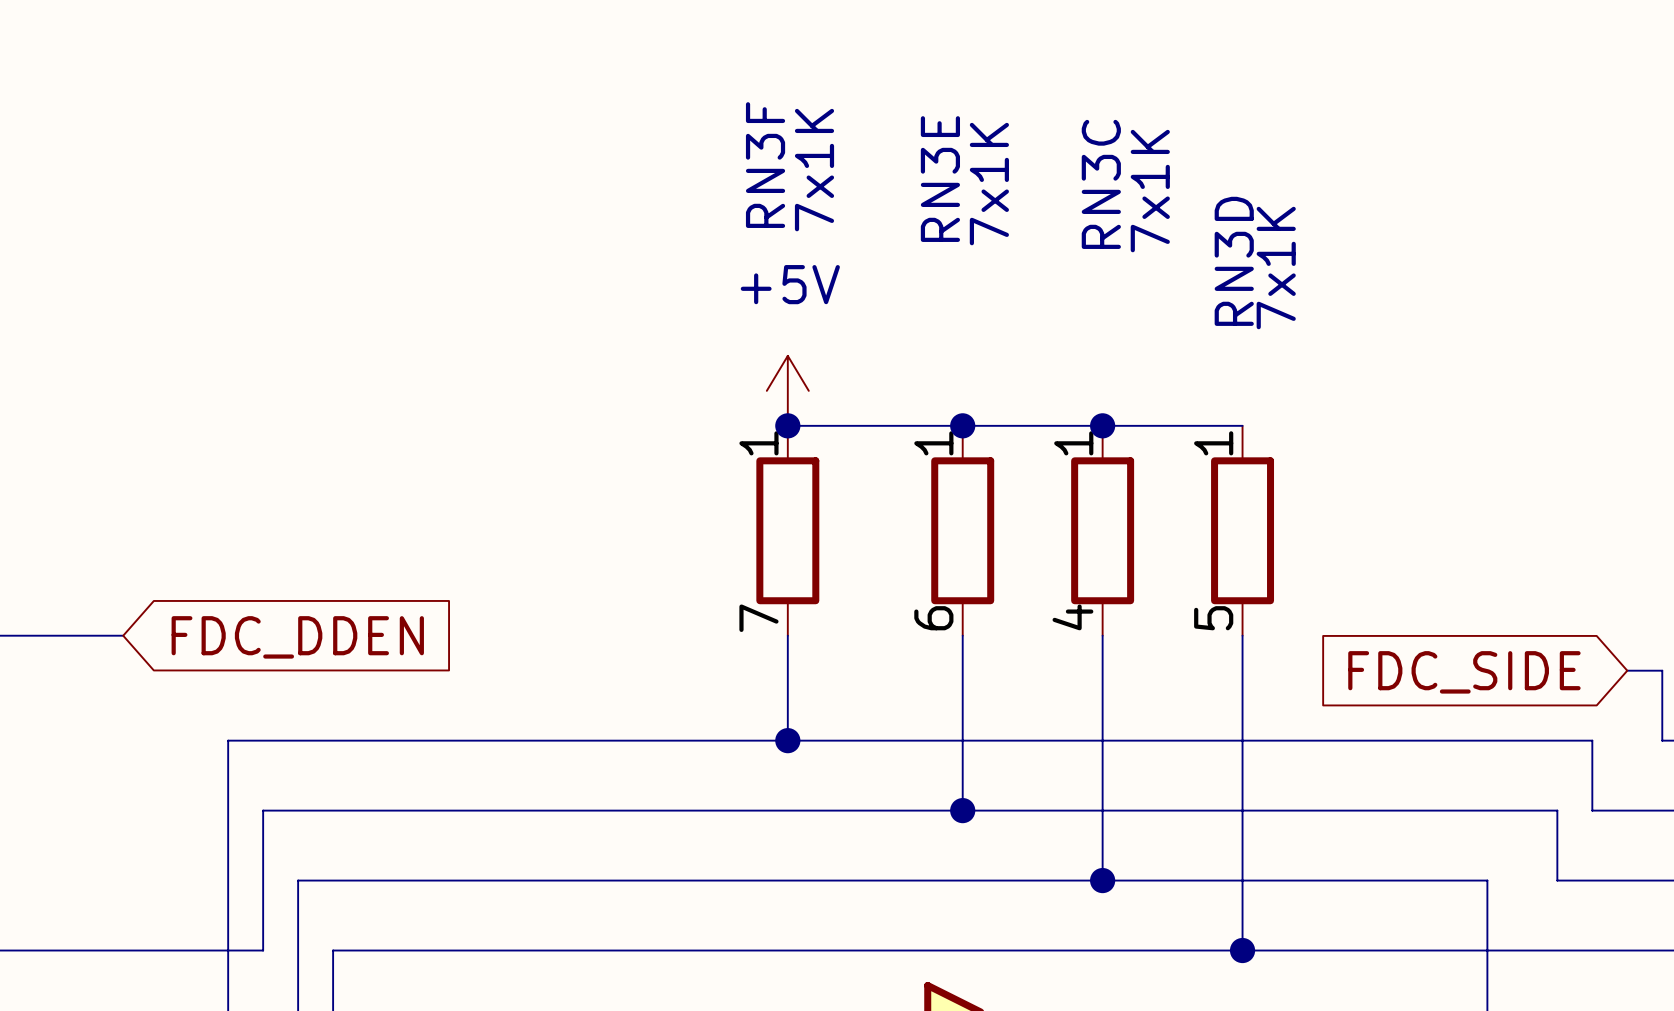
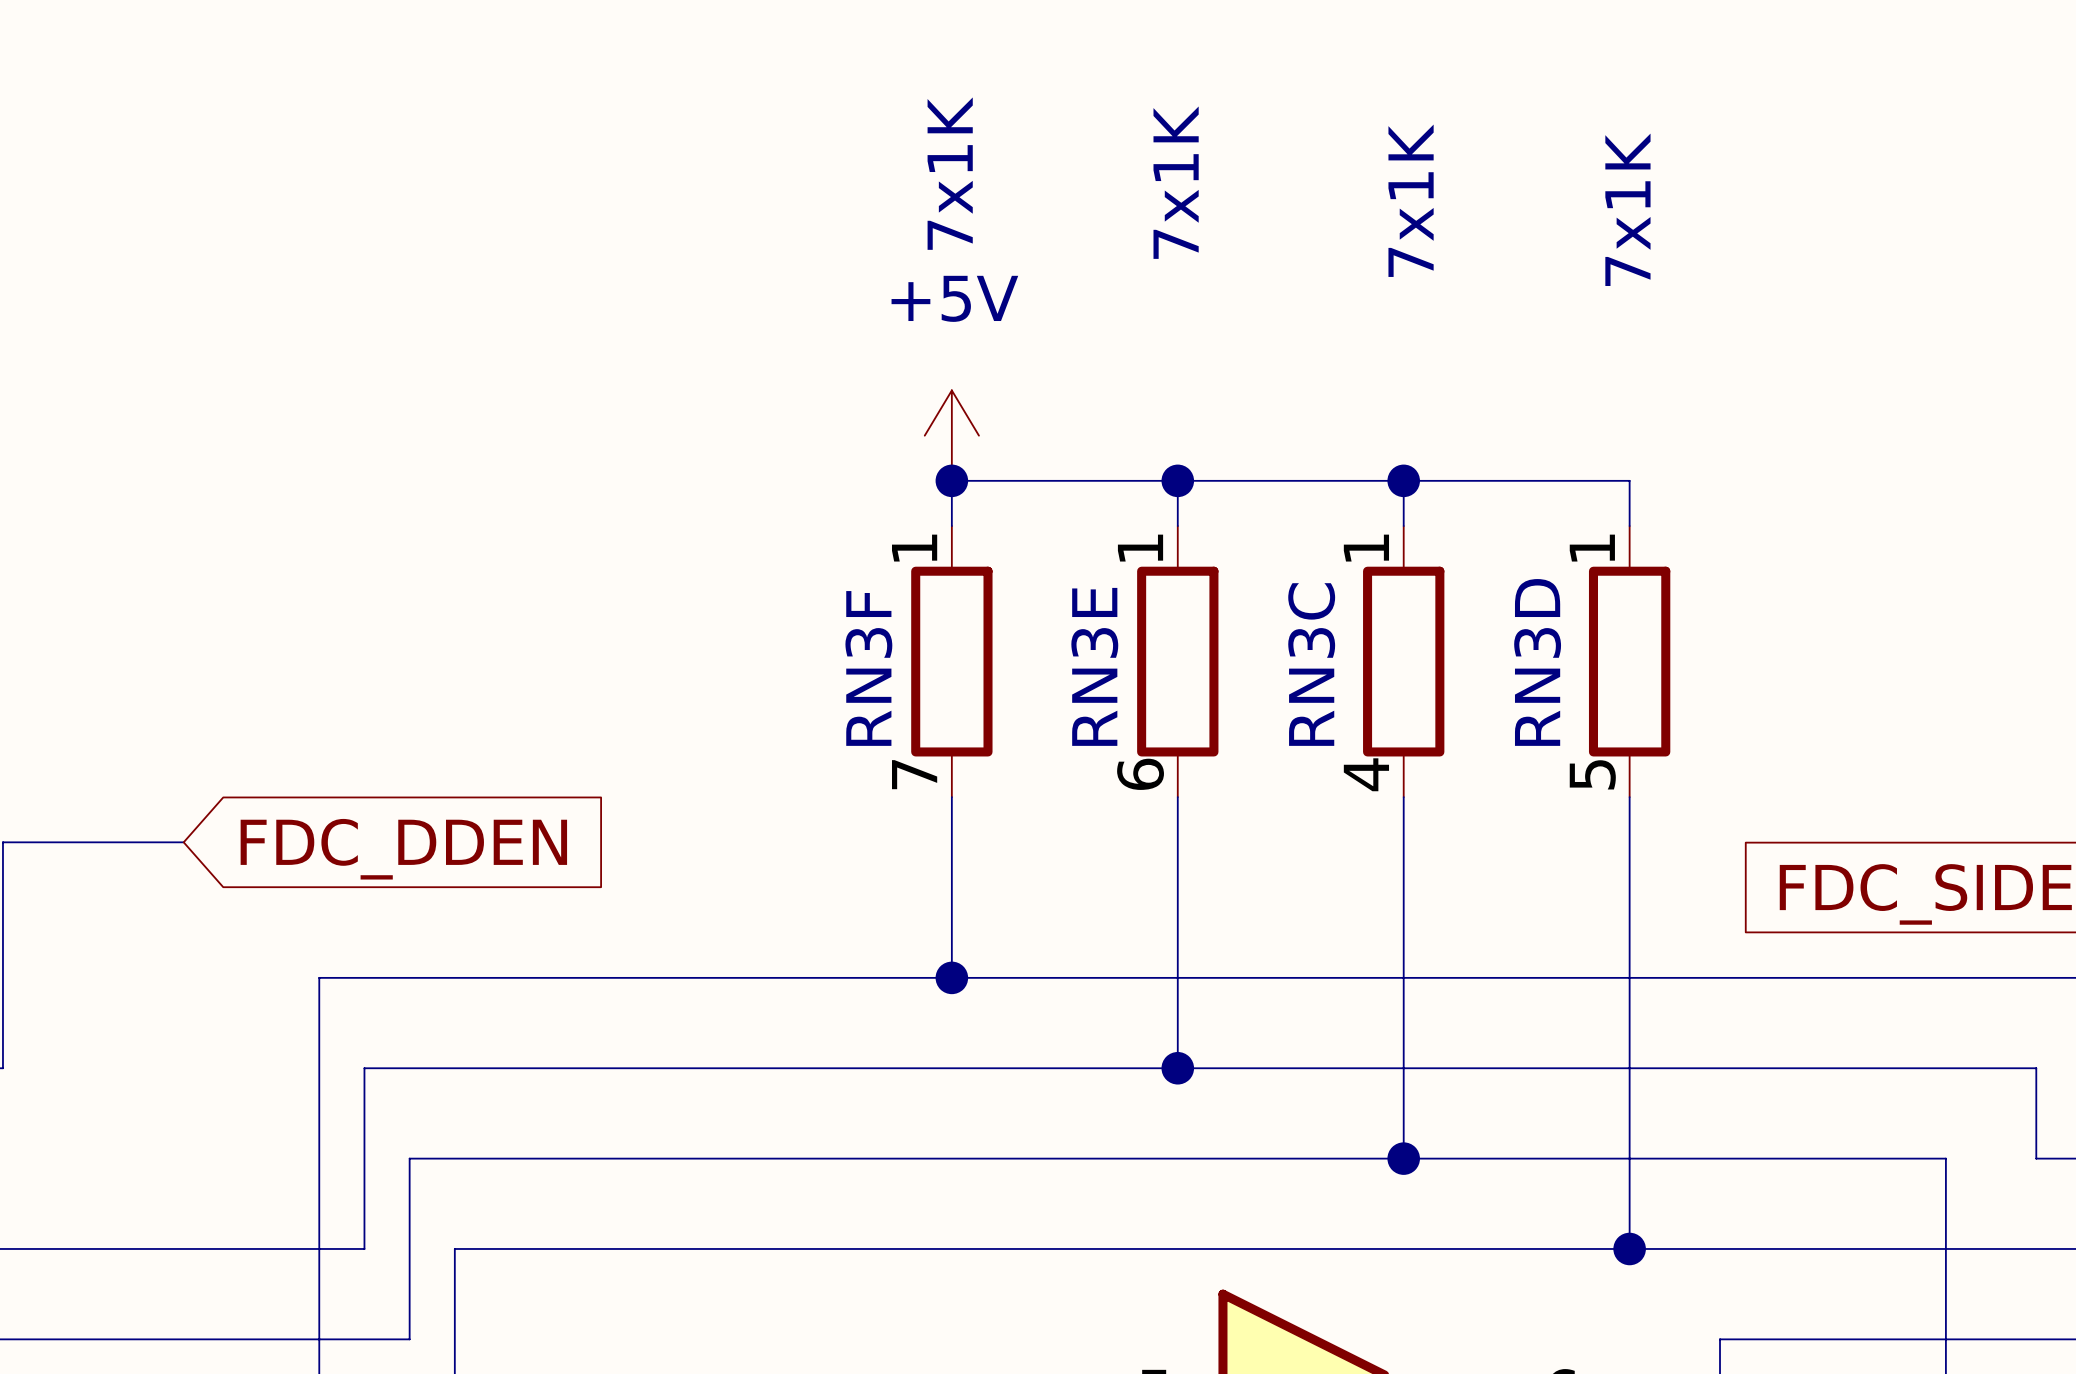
RN3F name position: RN3F (765, 165) -> RN3F (868, 668)
RN3F value position: 7x1K (814, 170) -> 7x1K (950, 173)
RN3E name position: RN3E (940, 179) -> RN3E (1094, 666)
RN3E value position: 7x1K (989, 184) -> 7x1K (1176, 182)
RN3C name position: RN3C (1101, 184) -> RN3C (1311, 664)
RN3C value position: 7x1K (1150, 191) -> 7x1K (1411, 200)
RN3D name position: RN3D (1234, 261) -> RN3D (1537, 662)
RN3D value position: 7x1K (1276, 268) -> 7x1K (1627, 209)
junction: none -> (951, 480)
wire: none -> (1177, 480) (1177, 526)
junction: none -> (1177, 480)
wire: none -> (1403, 480) (1403, 526)
junction: none -> (1403, 480)
wire: none -> (951, 526) (951, 480) (1629, 480) (1629, 526)
power symbol position: +5V (787, 390) -> +5V (951, 435)
wire: (787, 425) (1242, 425) -> none
junction: (787, 425) -> none
junction: (962, 425) -> none
junction: (1102, 425) -> none
RN3F position: (787, 530) -> (951, 661)
RN3E position: (962, 530) -> (1177, 661)
RN3C position: (1102, 530) -> (1403, 661)
RN3D position: (1242, 530) -> (1629, 661)
wire: none -> (951, 797) (951, 977)
wire: none -> (1177, 797) (1177, 1068)
wire: none -> (1403, 797) (1403, 1158)
wire: (787, 635) (787, 740) -> none
wire: (962, 635) (962, 810) -> none
wire: (1102, 635) (1102, 880) -> none
junction: none -> (951, 977)
junction: (787, 740) -> none
junction: none -> (1177, 1068)
junction: (962, 810) -> none
junction position: (1102, 880) -> (1403, 1158)

